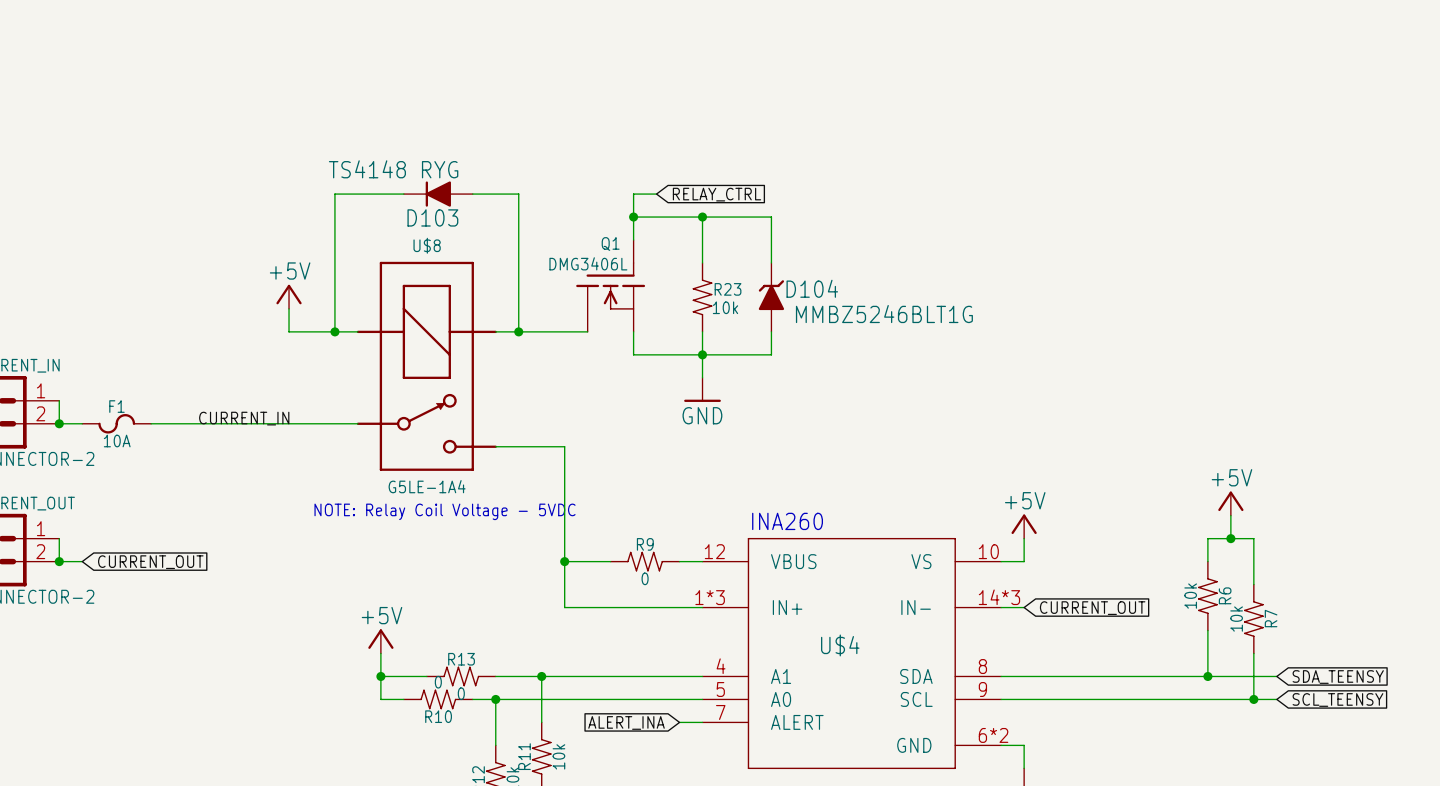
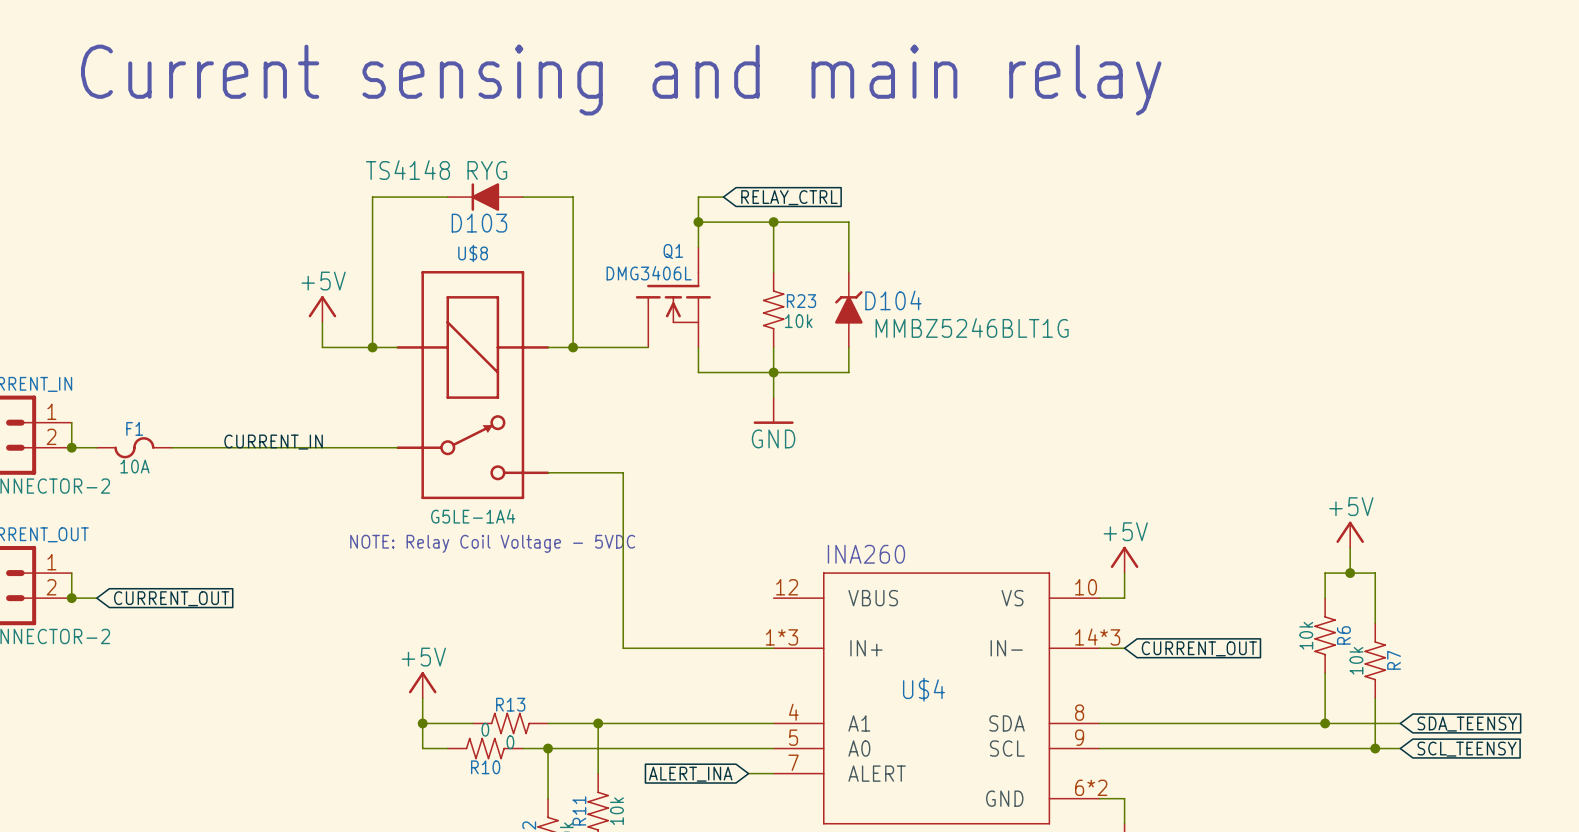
text: none -> Current sensing and main relay (621, 80)
wire: (564, 561) (610, 561) -> none
junction: (564, 561) -> none
R9: 0 (645, 561) -> none
wire: (679, 561) (702, 561) -> none

